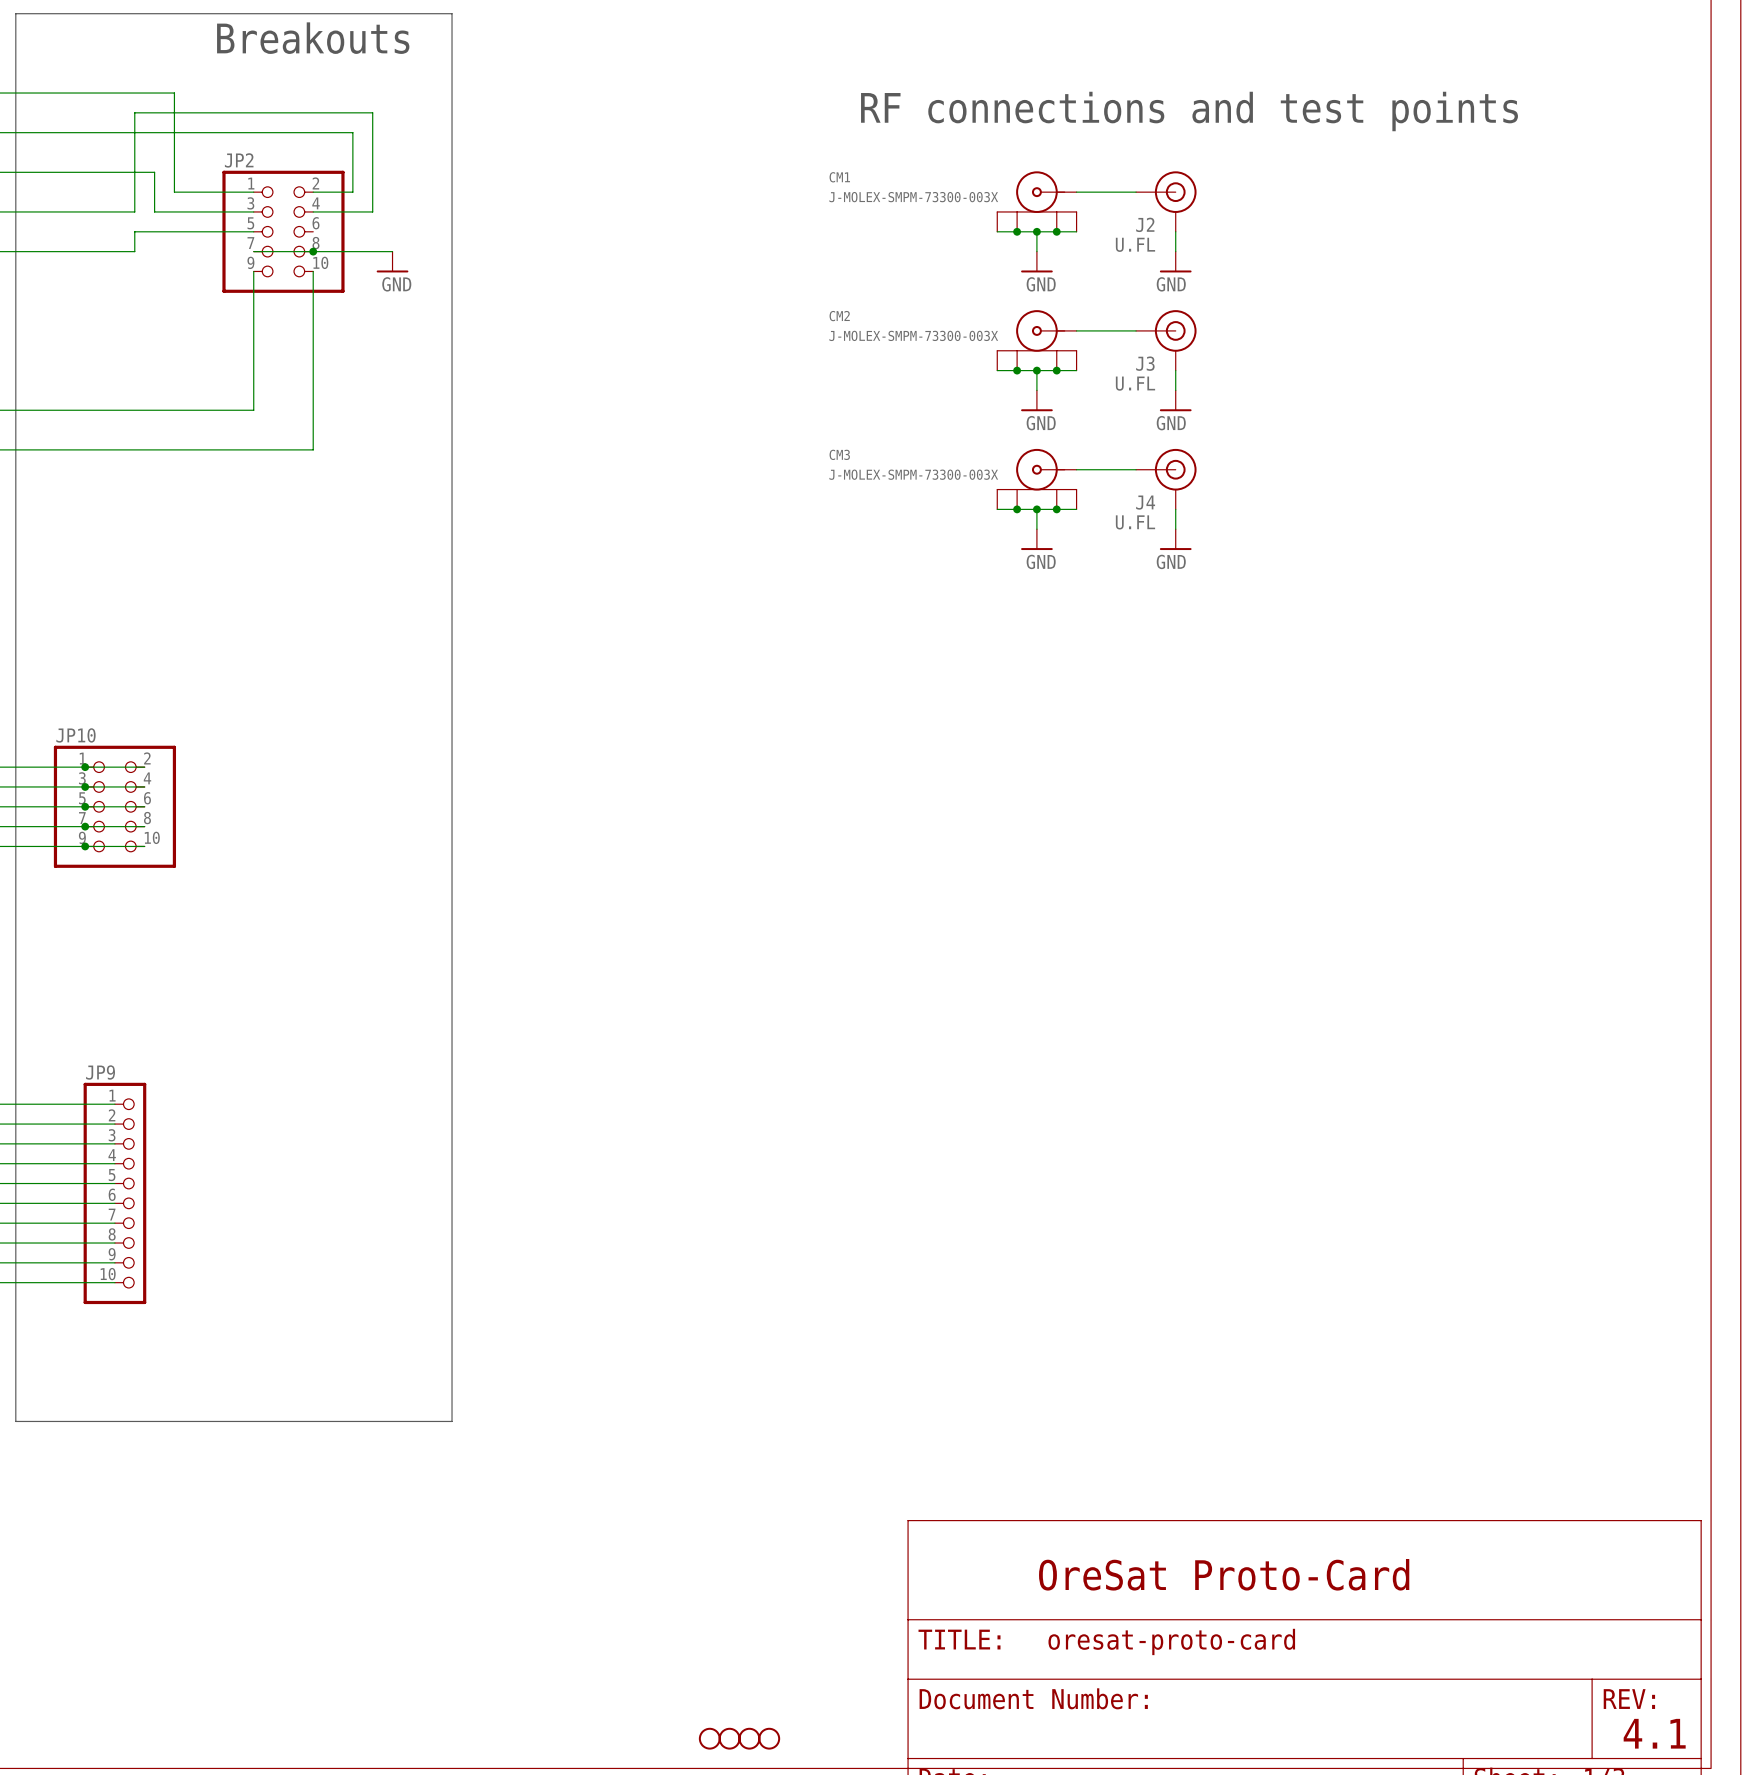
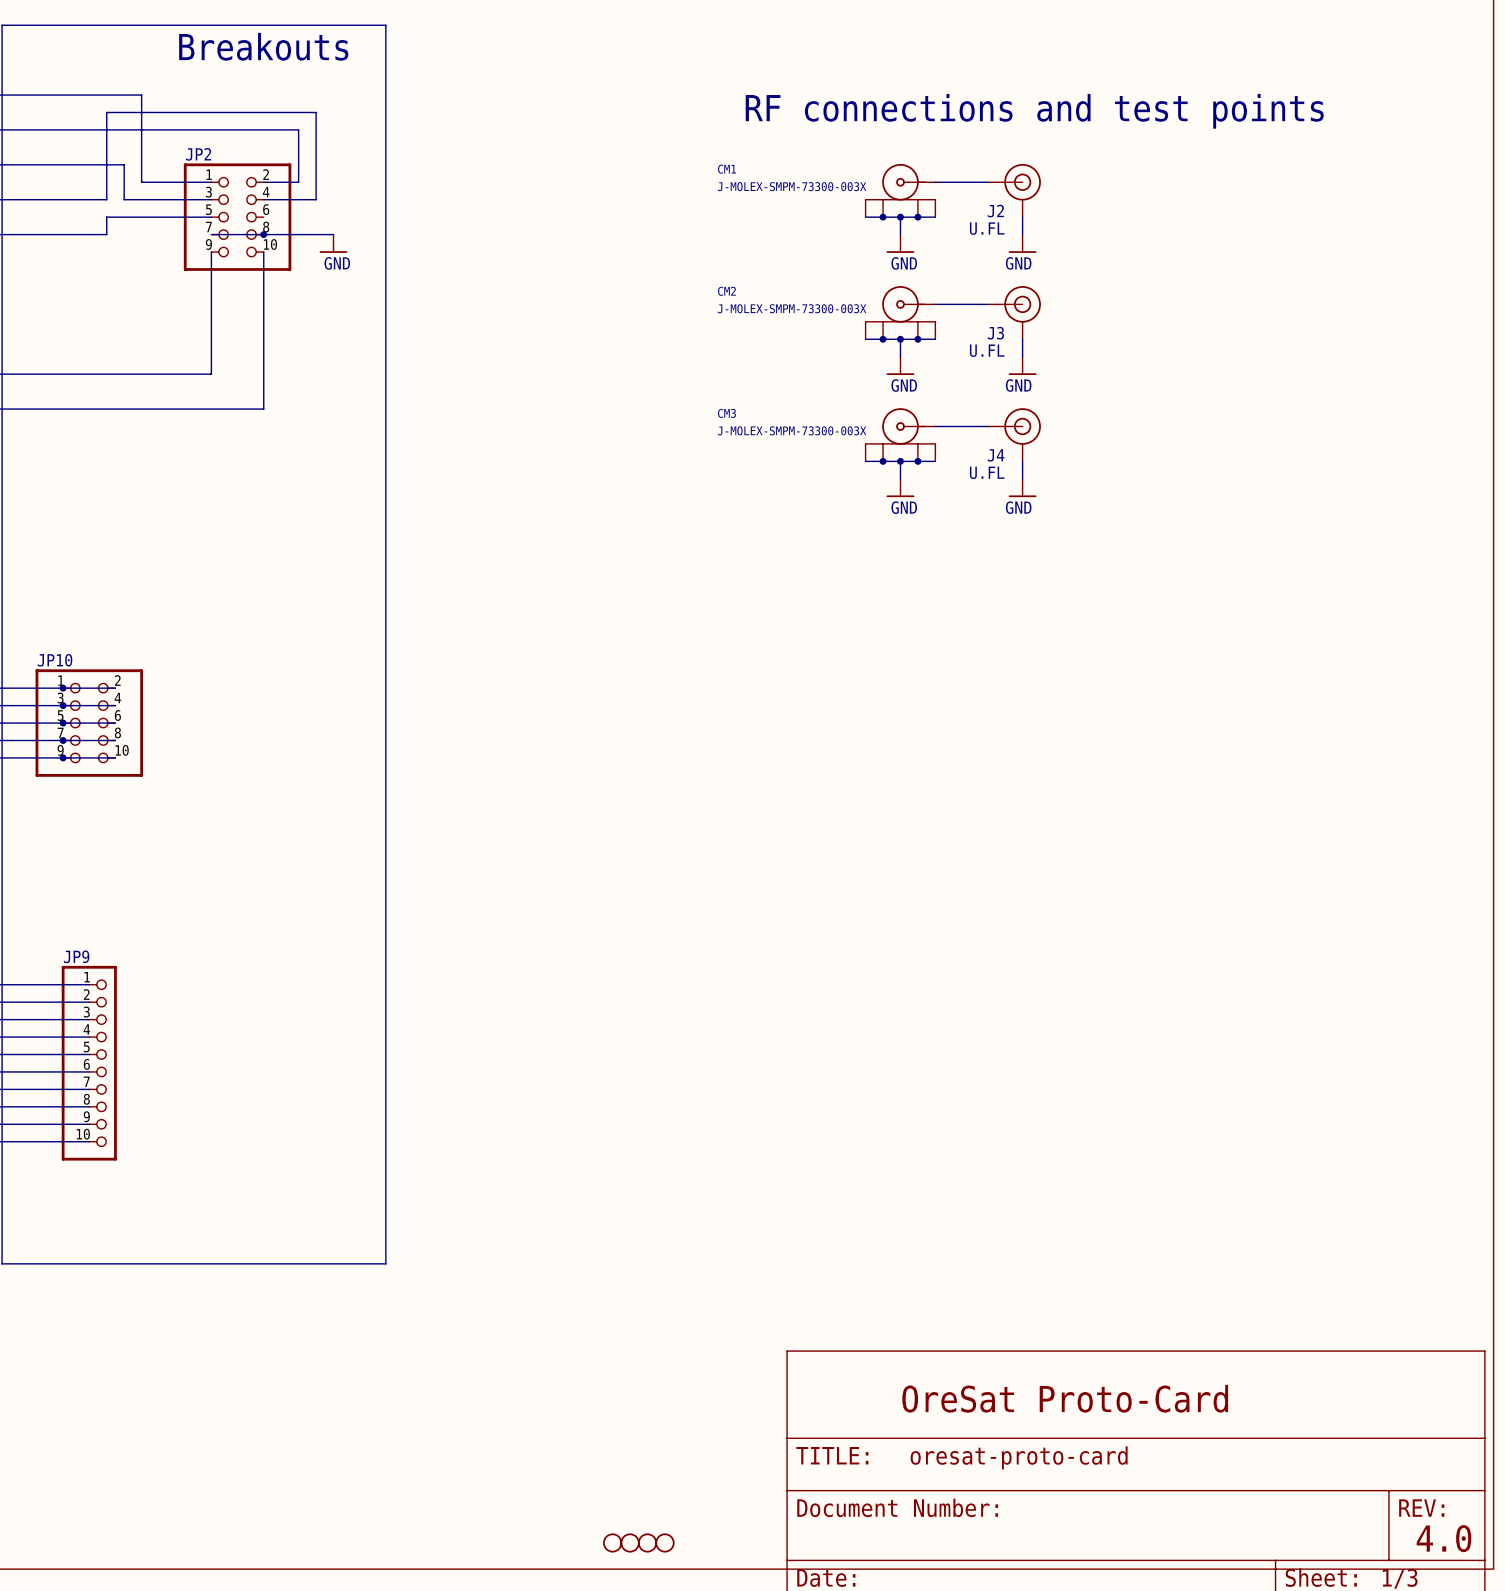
text: 4.1 (1654, 1733) -> 4.0 (1444, 1538)

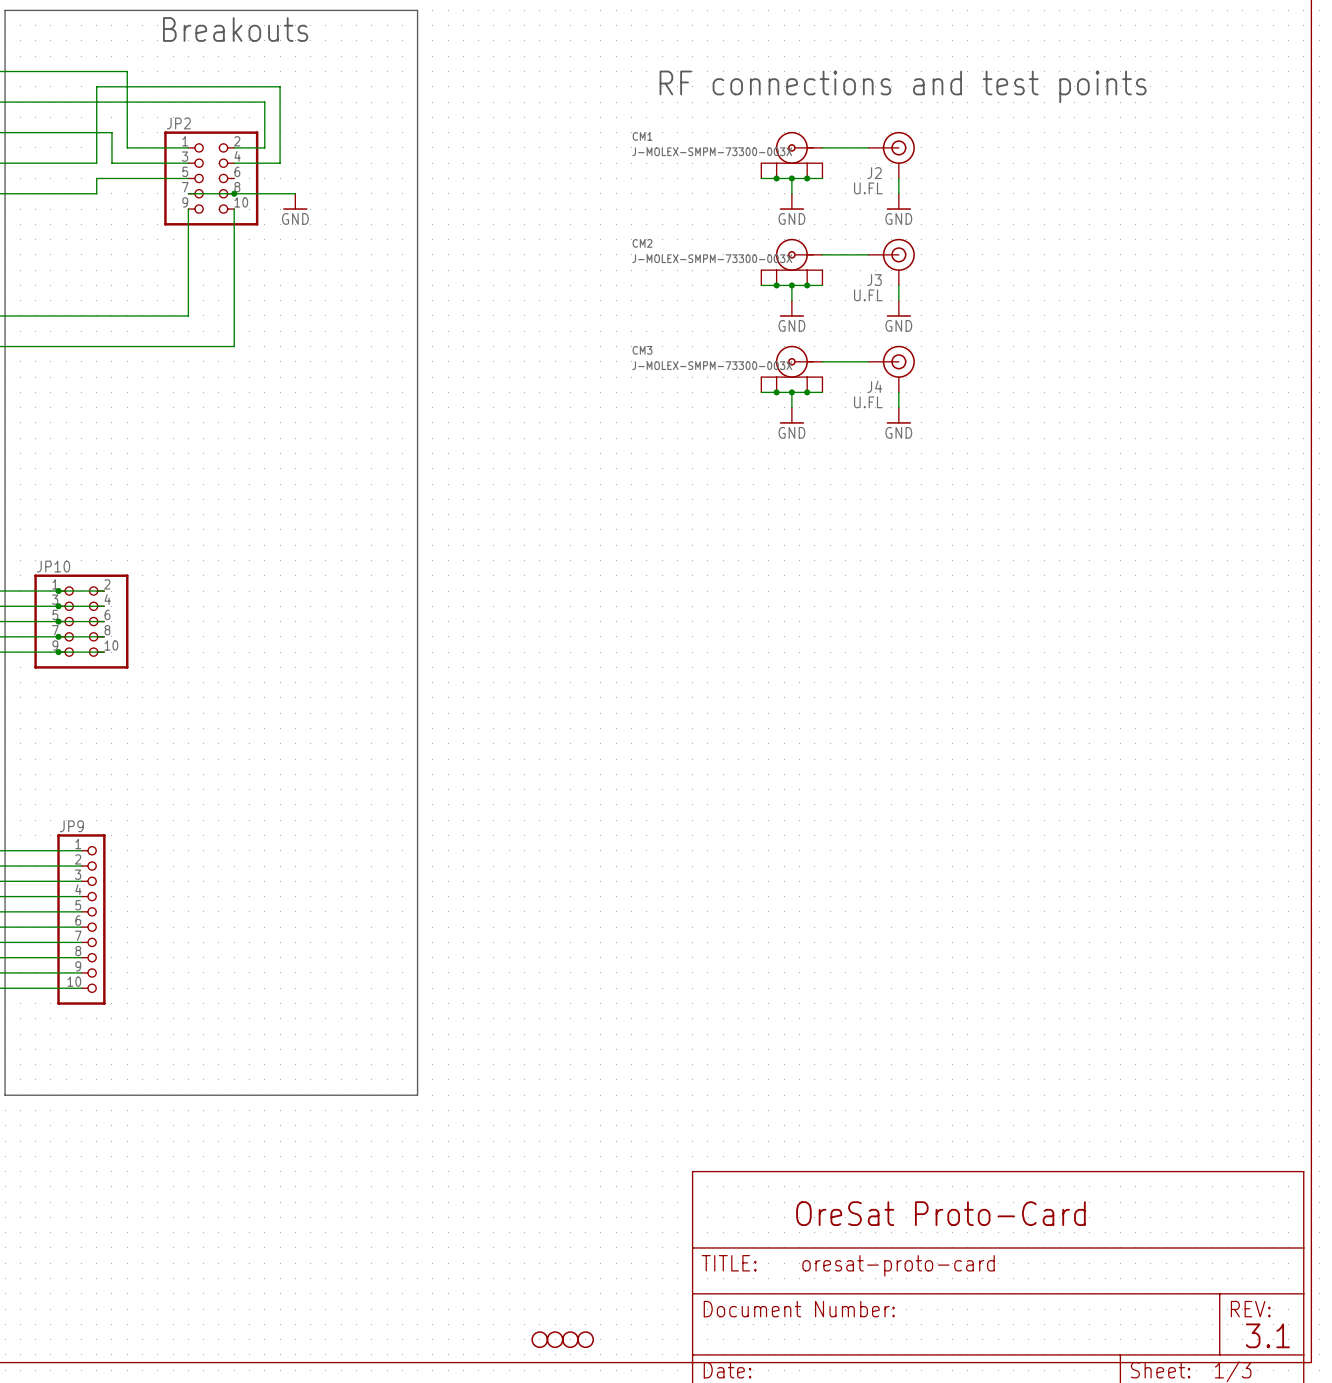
line: (385, 25) (385, 1263) -> (341, 10) (417, 10) (417, 1095) (341, 1095)
text: 4.0 (1444, 1538) -> 3.1 (1267, 1335)

